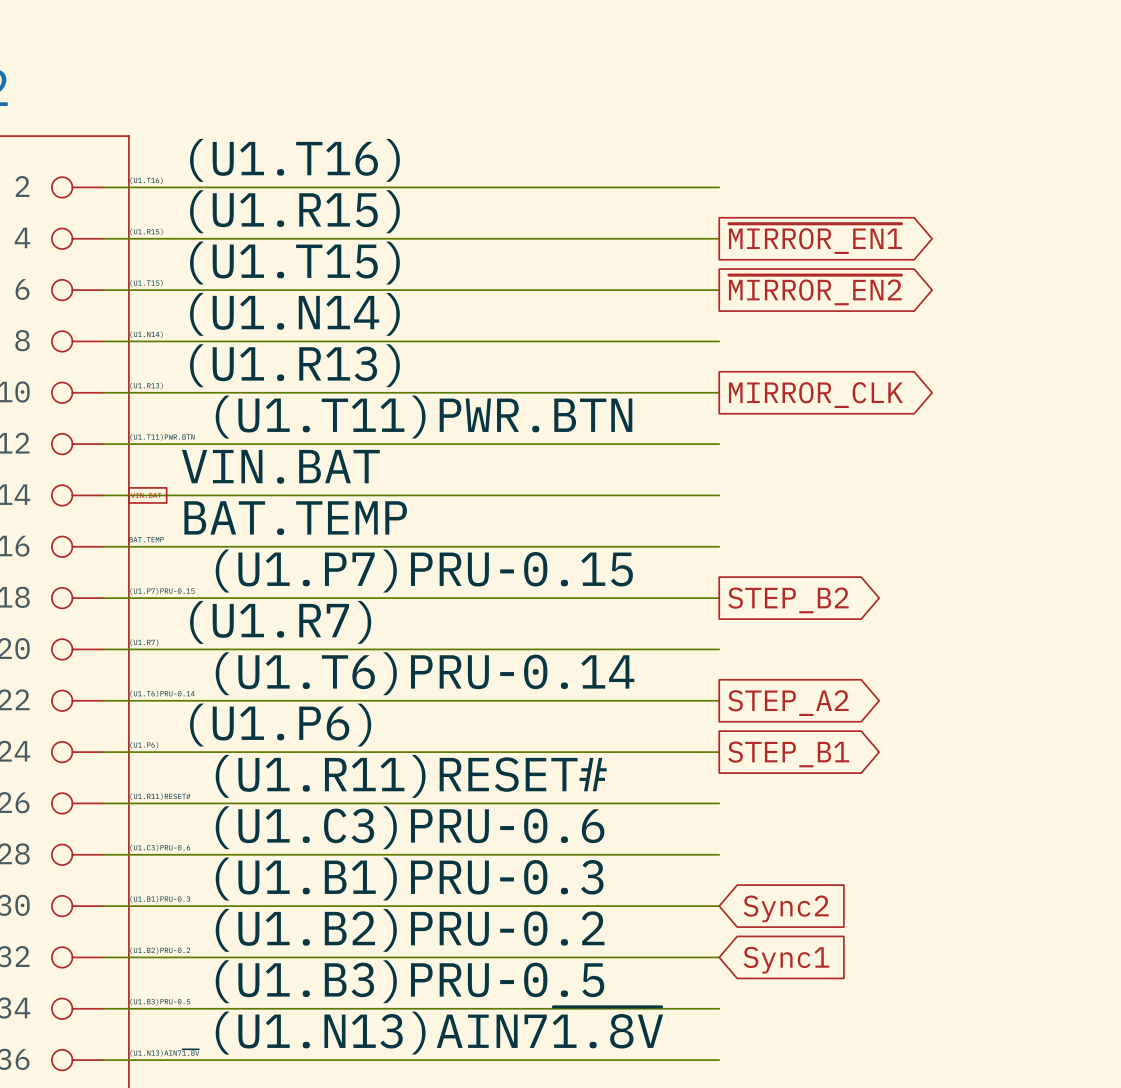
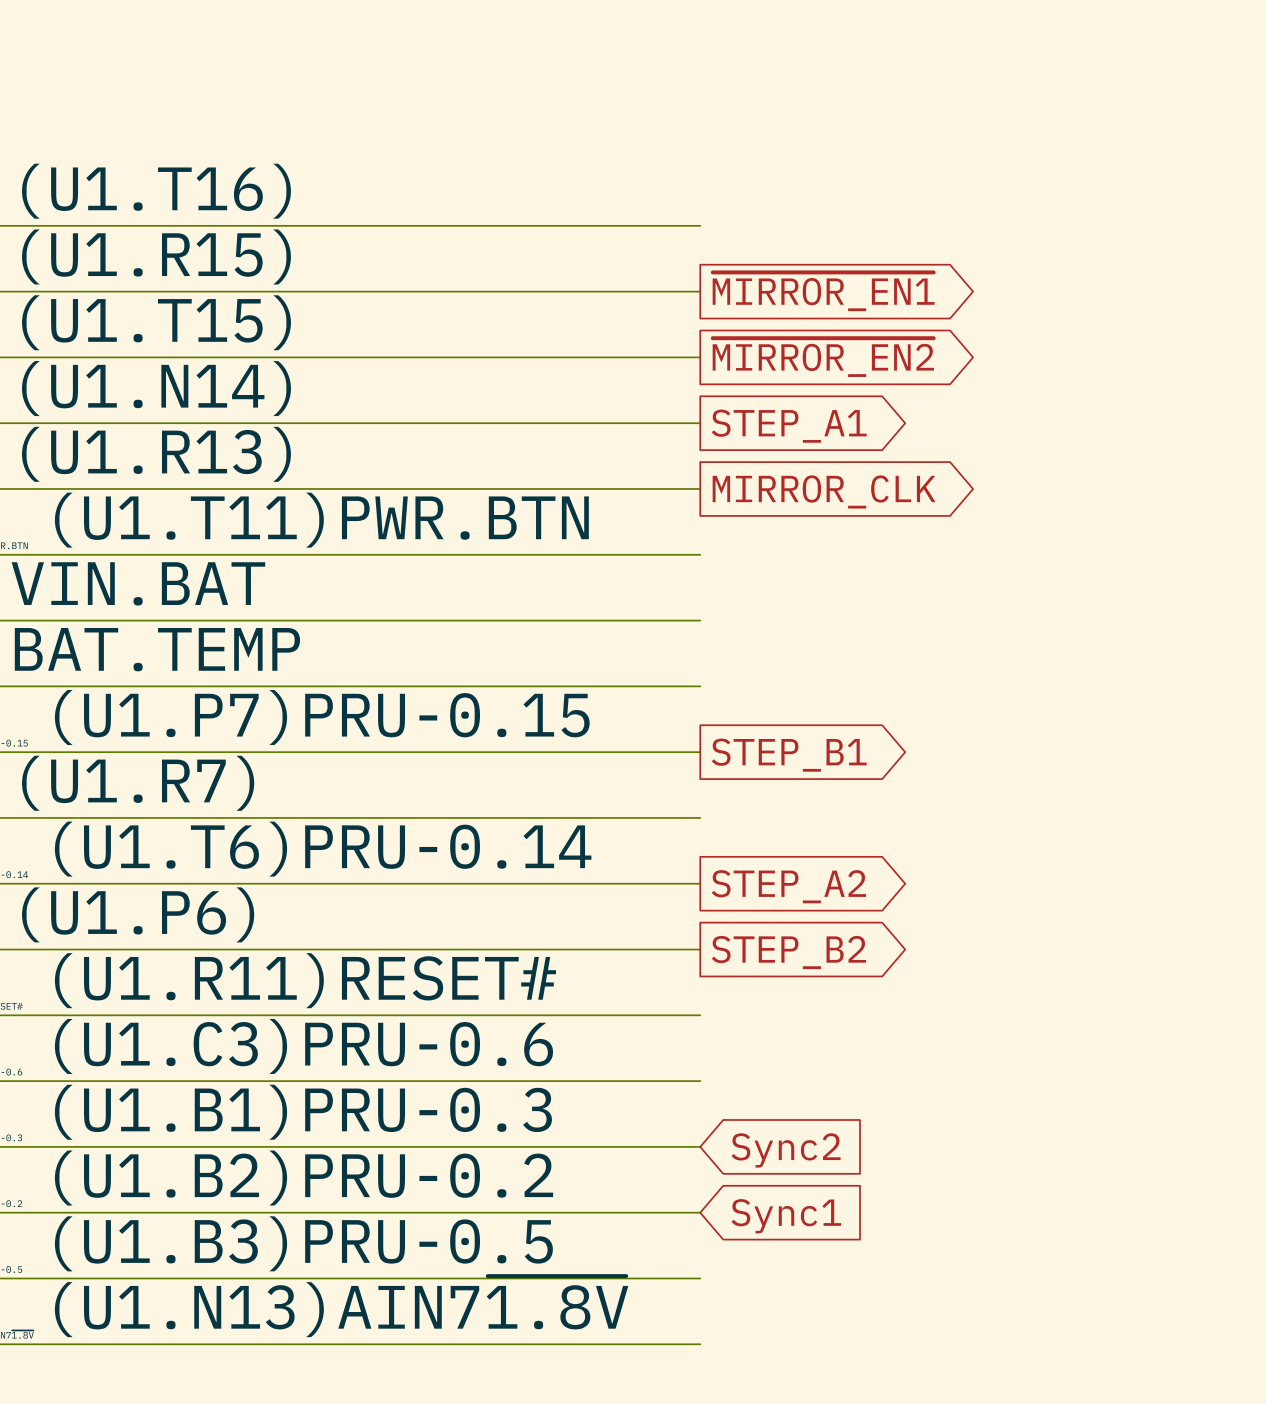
global label: none -> STEP_A1 (789, 426)
global label: STEP_B2 (788, 600) -> STEP_B1 (789, 755)
global label: STEP_B1 (788, 754) -> STEP_B2 (788, 952)

